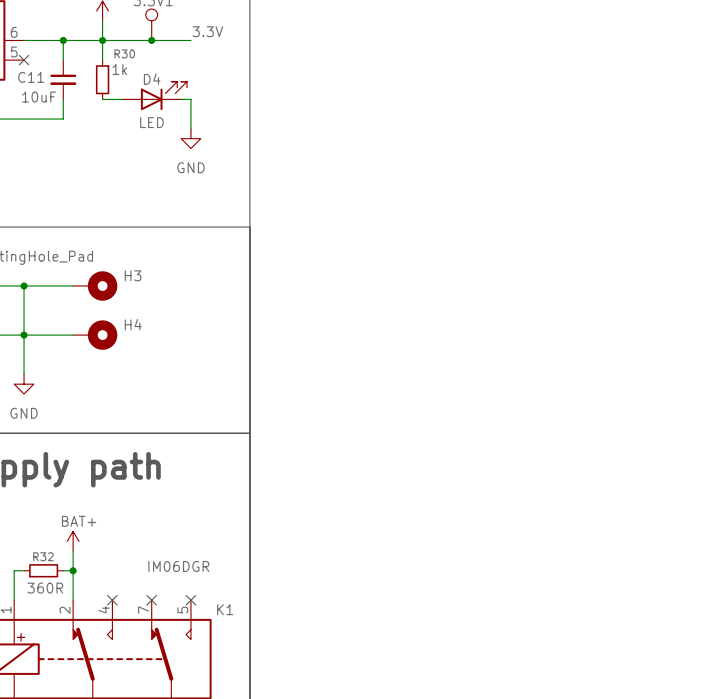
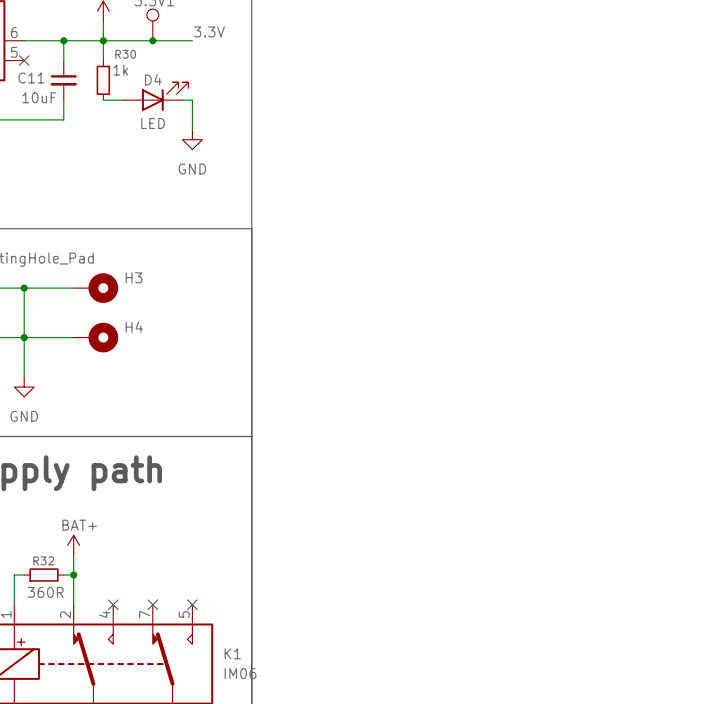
K1 value: IM06DGR (178, 566) -> IM06 (240, 673)
K1 name position: K1 (225, 609) -> K1 (232, 653)

